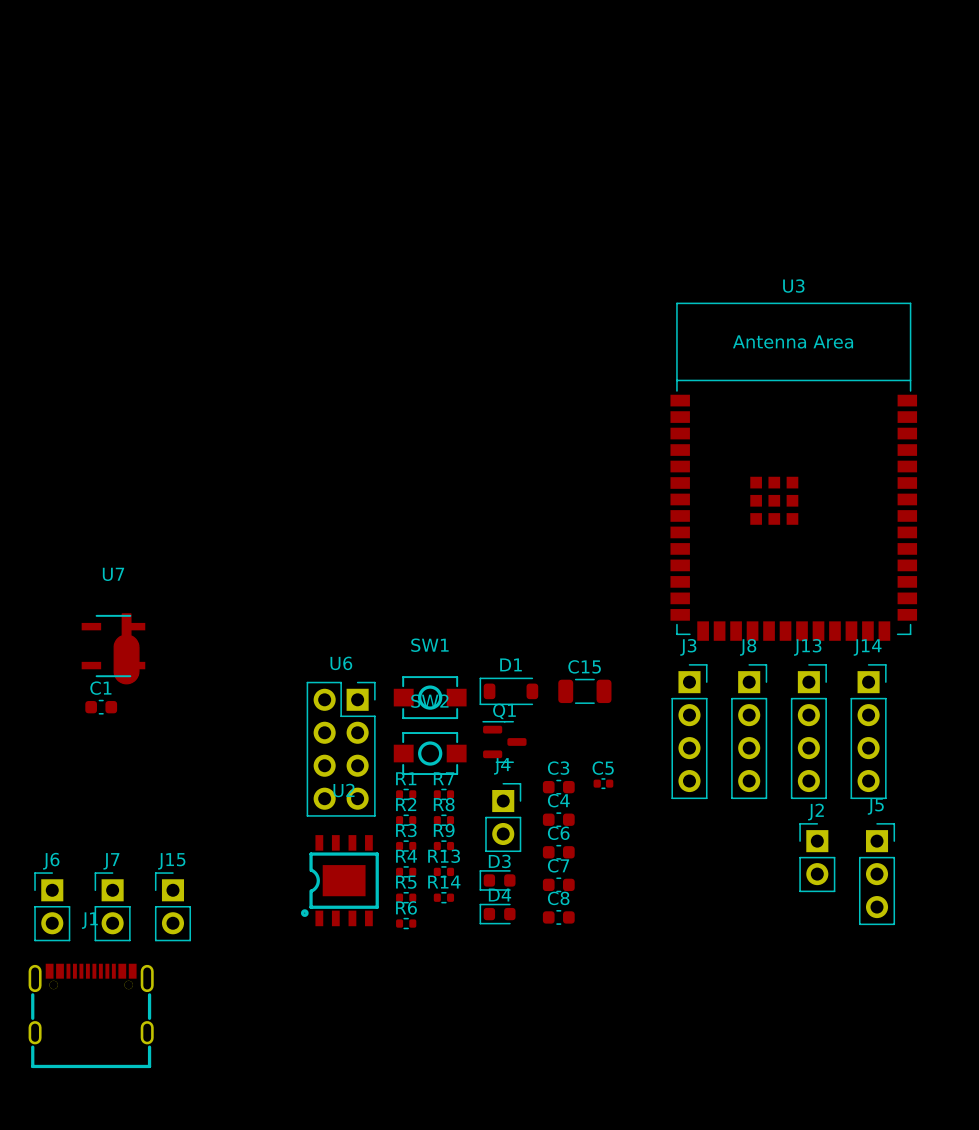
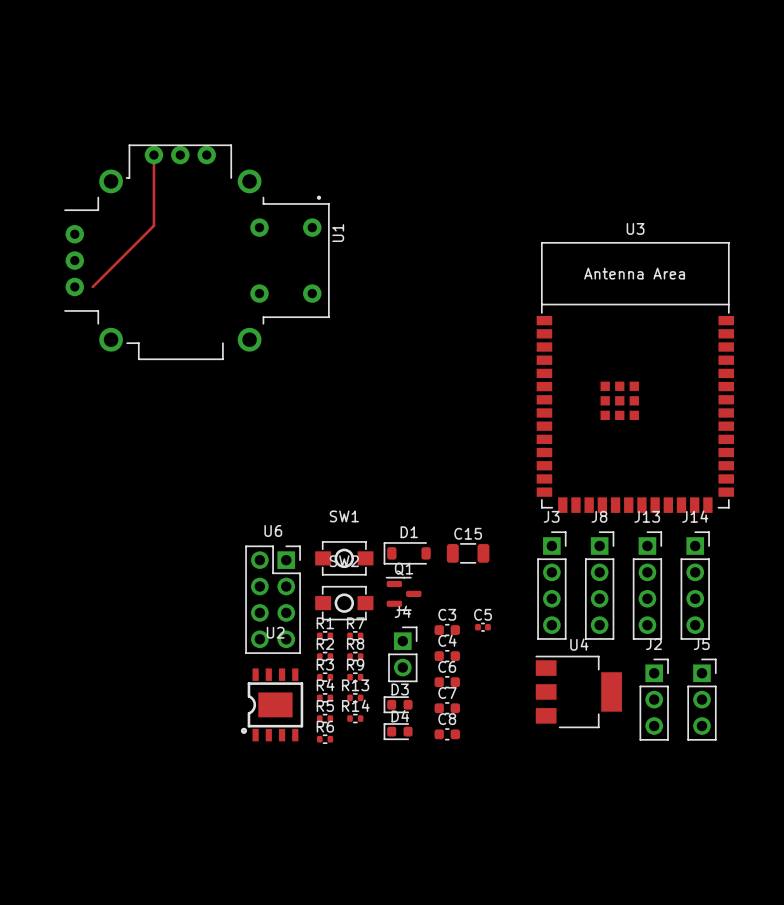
top track: none -> (153, 155) (153, 225) (92, 286)
U1: none -> (196, 252)
U7: (113, 648) -> none
C1: (101, 707) -> none
J2 footprint: [799, 823, 836, 893] -> [639, 658, 669, 741]
U4: none -> (578, 691)
J6: (52, 906) -> none
J7: (112, 906) -> none
J15: (172, 906) -> none
J1: (91, 1015) -> none

